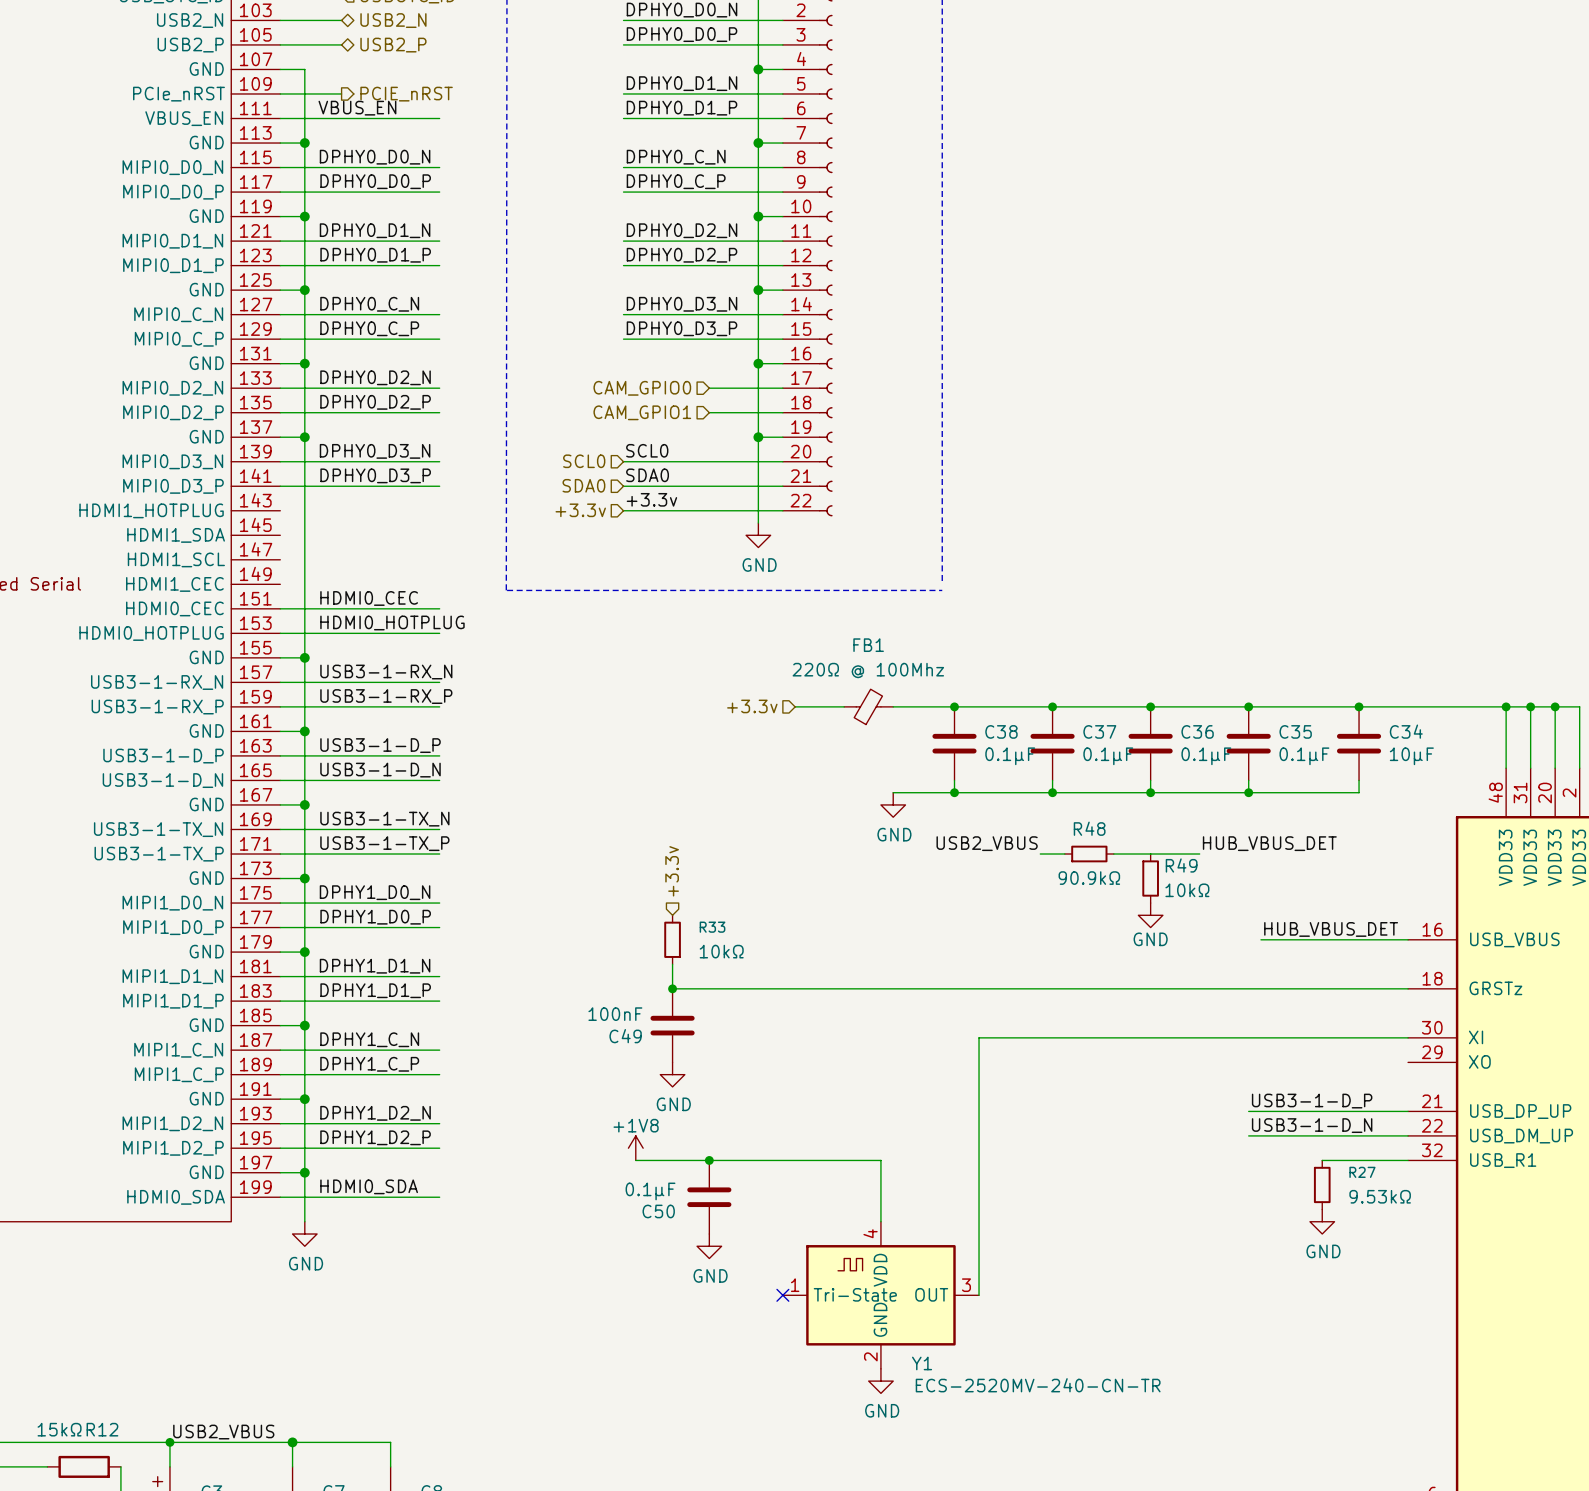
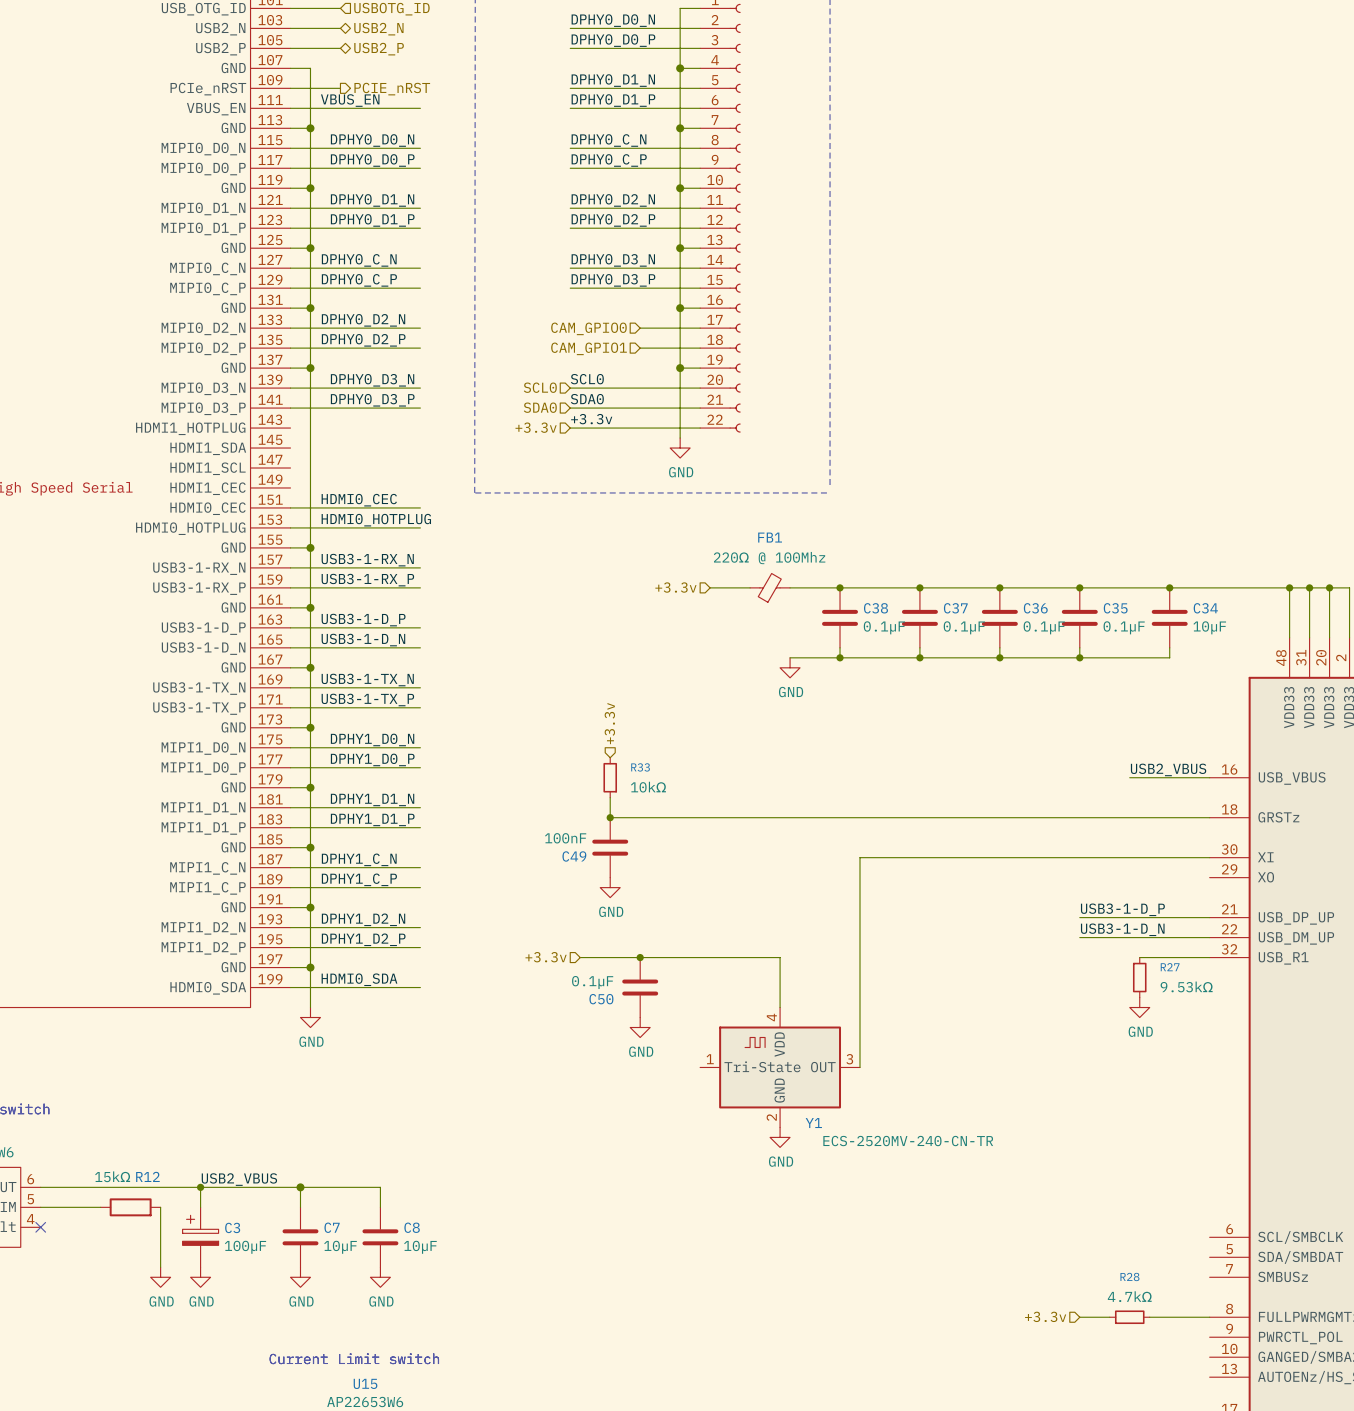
label: USB2_VBUS (987, 843) -> none
label: HUB_VBUS_DET (1269, 843) -> none
wire: (1040, 854) (1064, 854) -> none
R48: 90.9kΩ (1089, 854) -> none
wire: (1113, 854) (1199, 854) -> none
R49: 10kΩ (1150, 878) -> none
power symbol: GND (1150, 915) -> none
label: HUB_VBUS_DET (1331, 929) -> USB2_VBUS (1168, 769)
wire: (1260, 939) (1309, 939) -> none
power symbol: +1V8 (635, 1148) -> none
hierarchical label: none -> +3.3v (546, 957)
no-connect mark: (782, 1295) -> none

